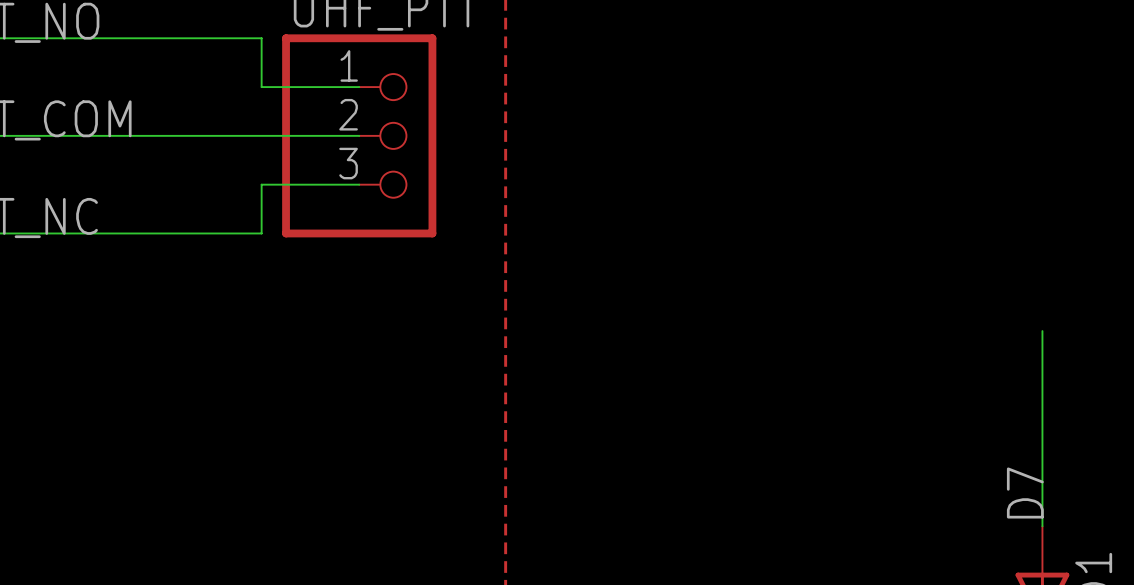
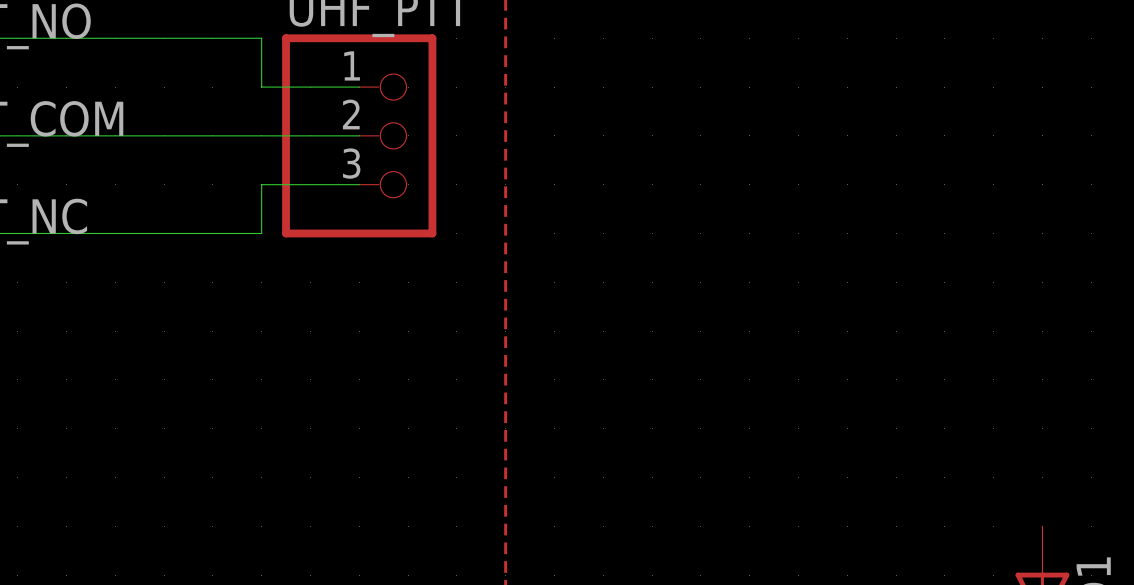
wire: (1042, 331) (1042, 526) -> none
label: D7 (1025, 493) -> none

